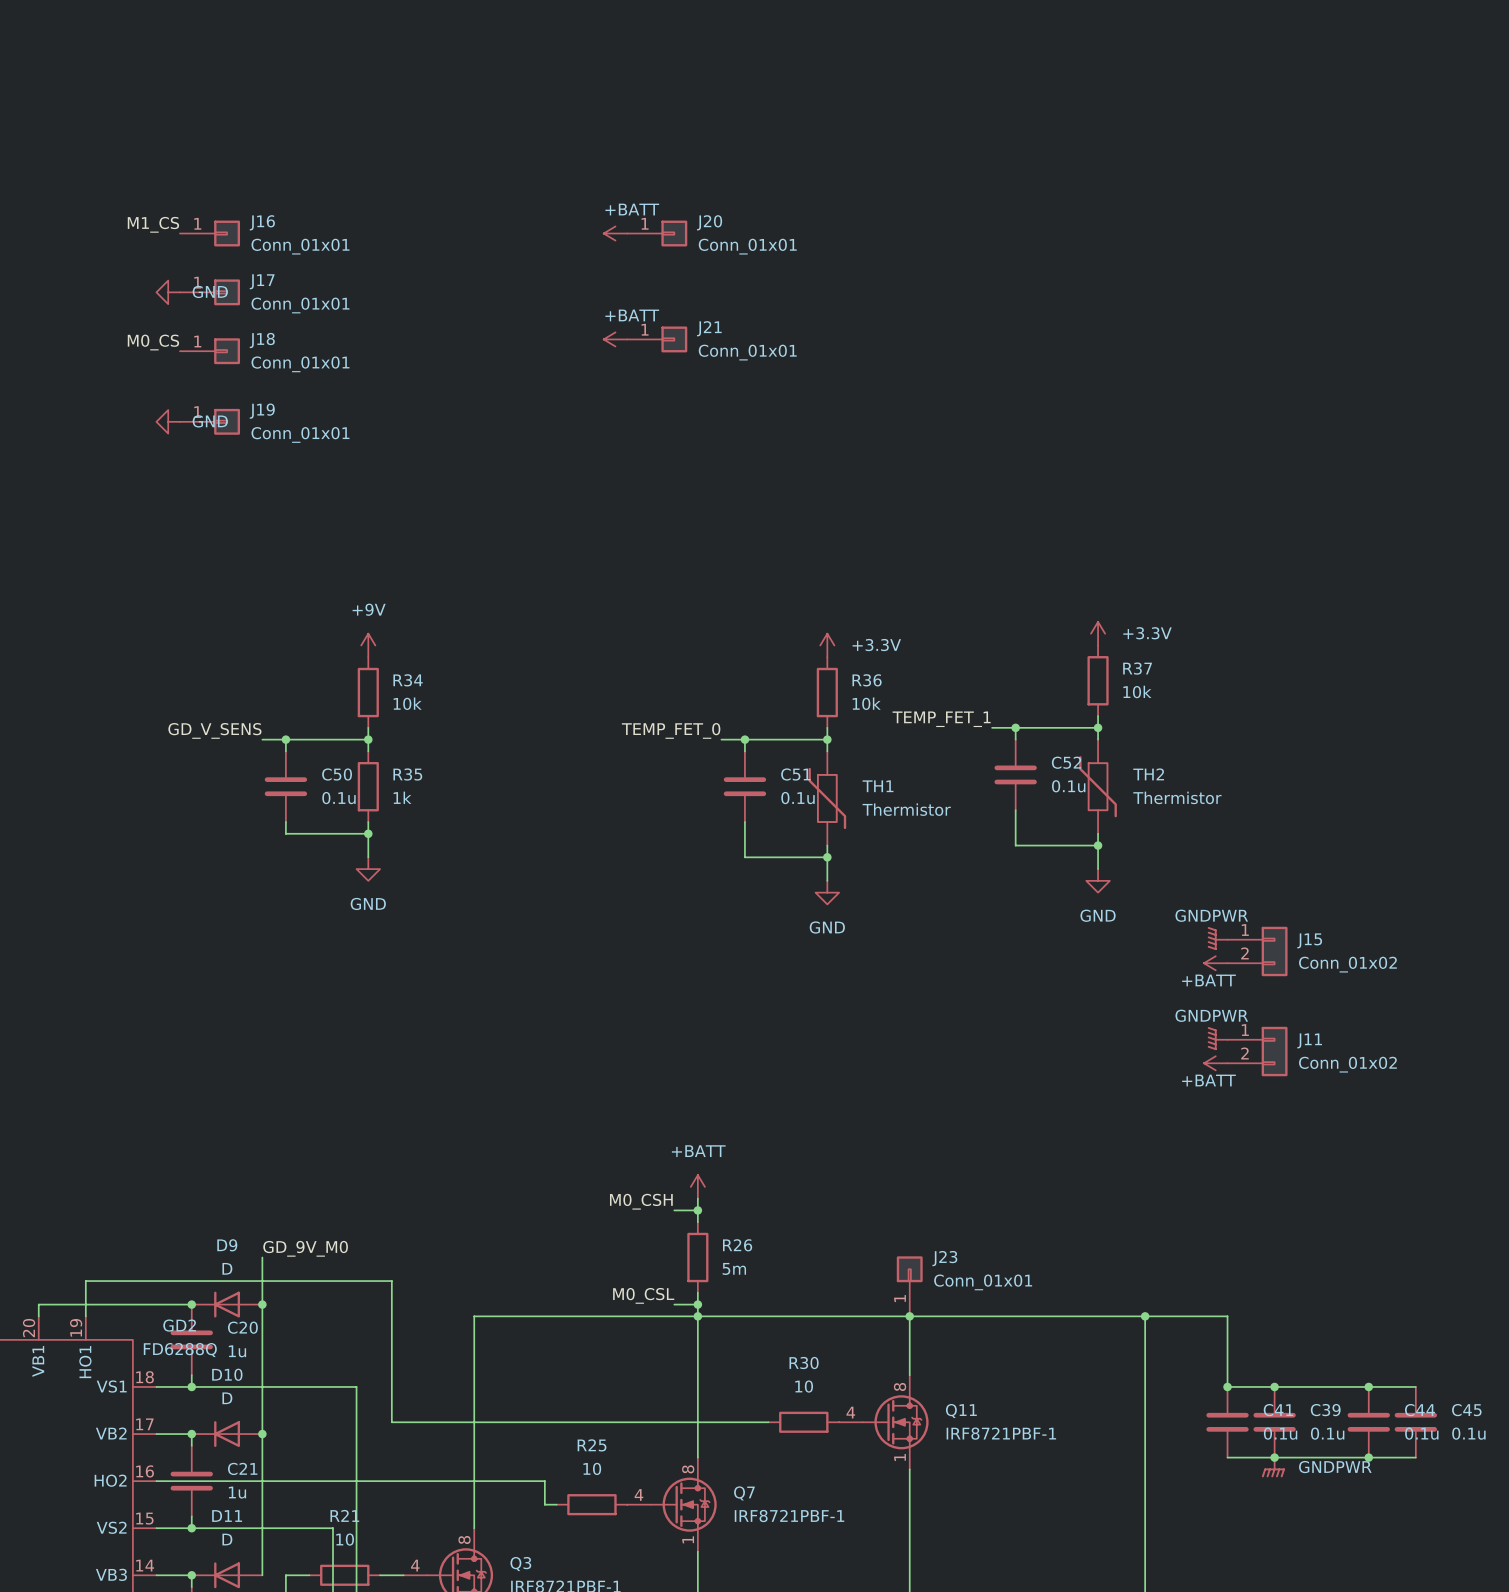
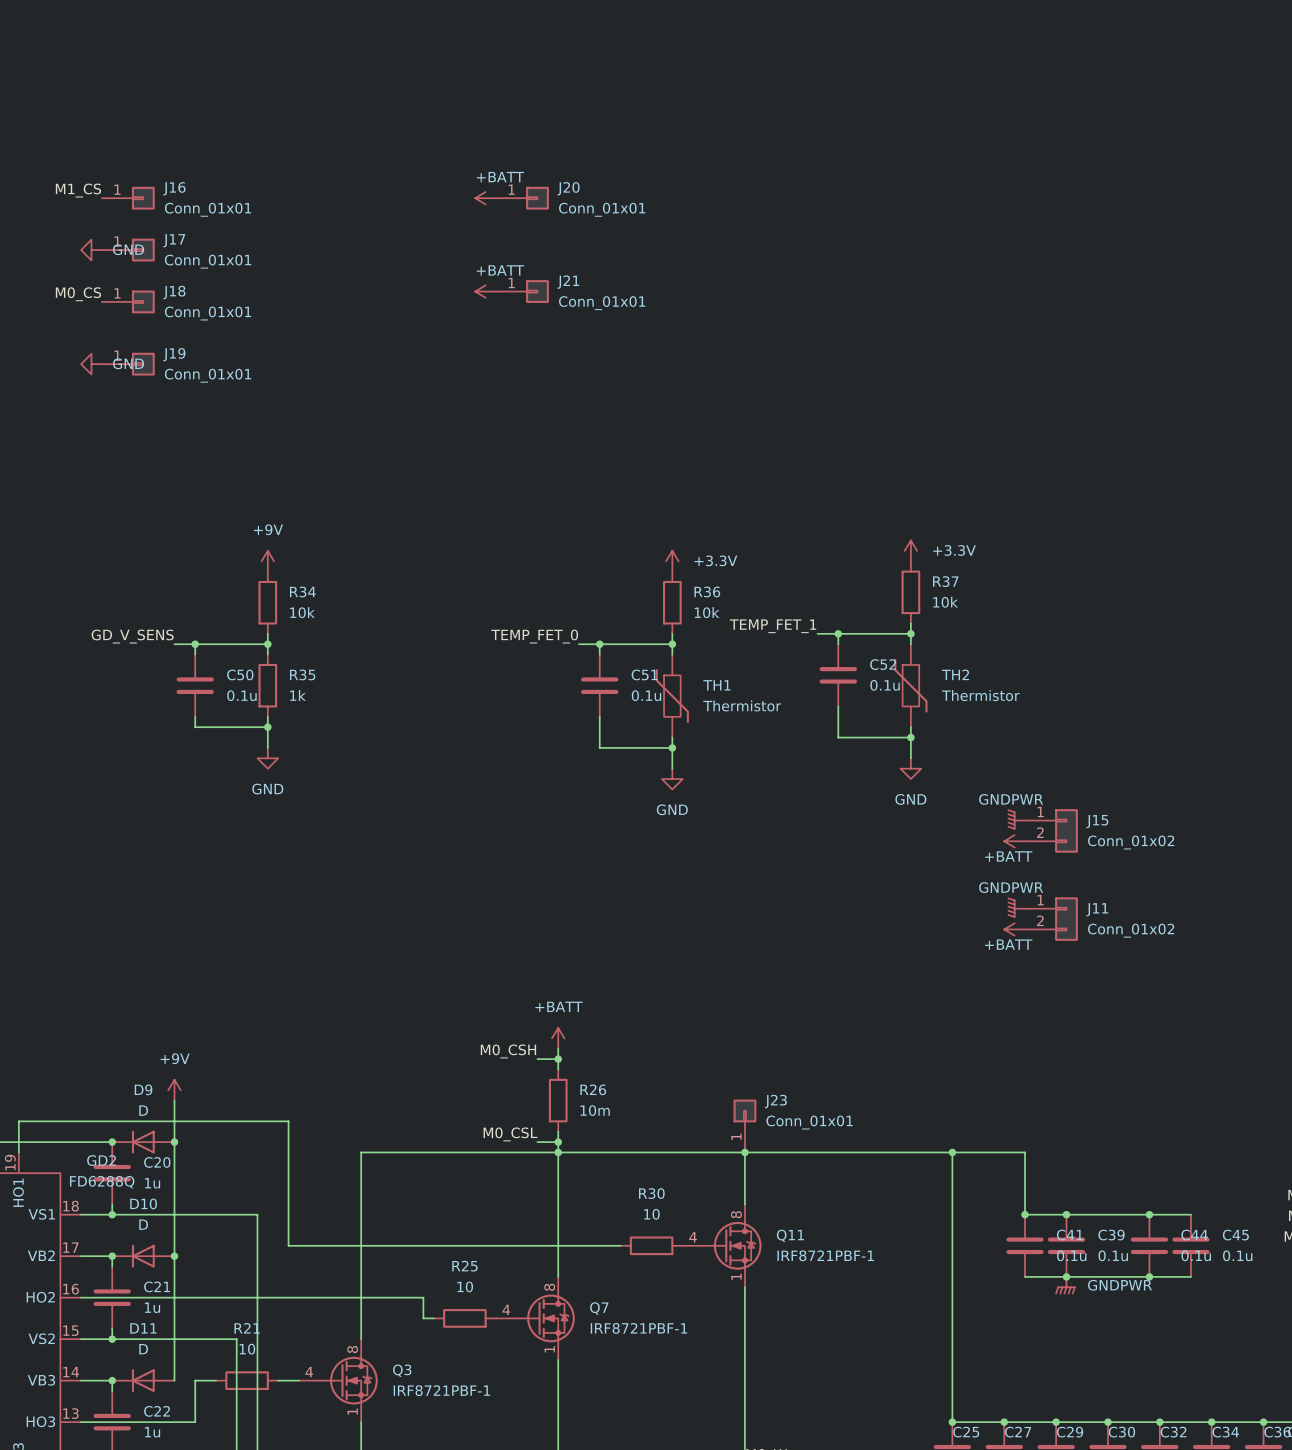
power symbol: none -> +9V (174, 1090)
label: GD_9V_M0 (305, 1248) -> none
R26 value: 5m (734, 1268) -> 10m (595, 1110)

